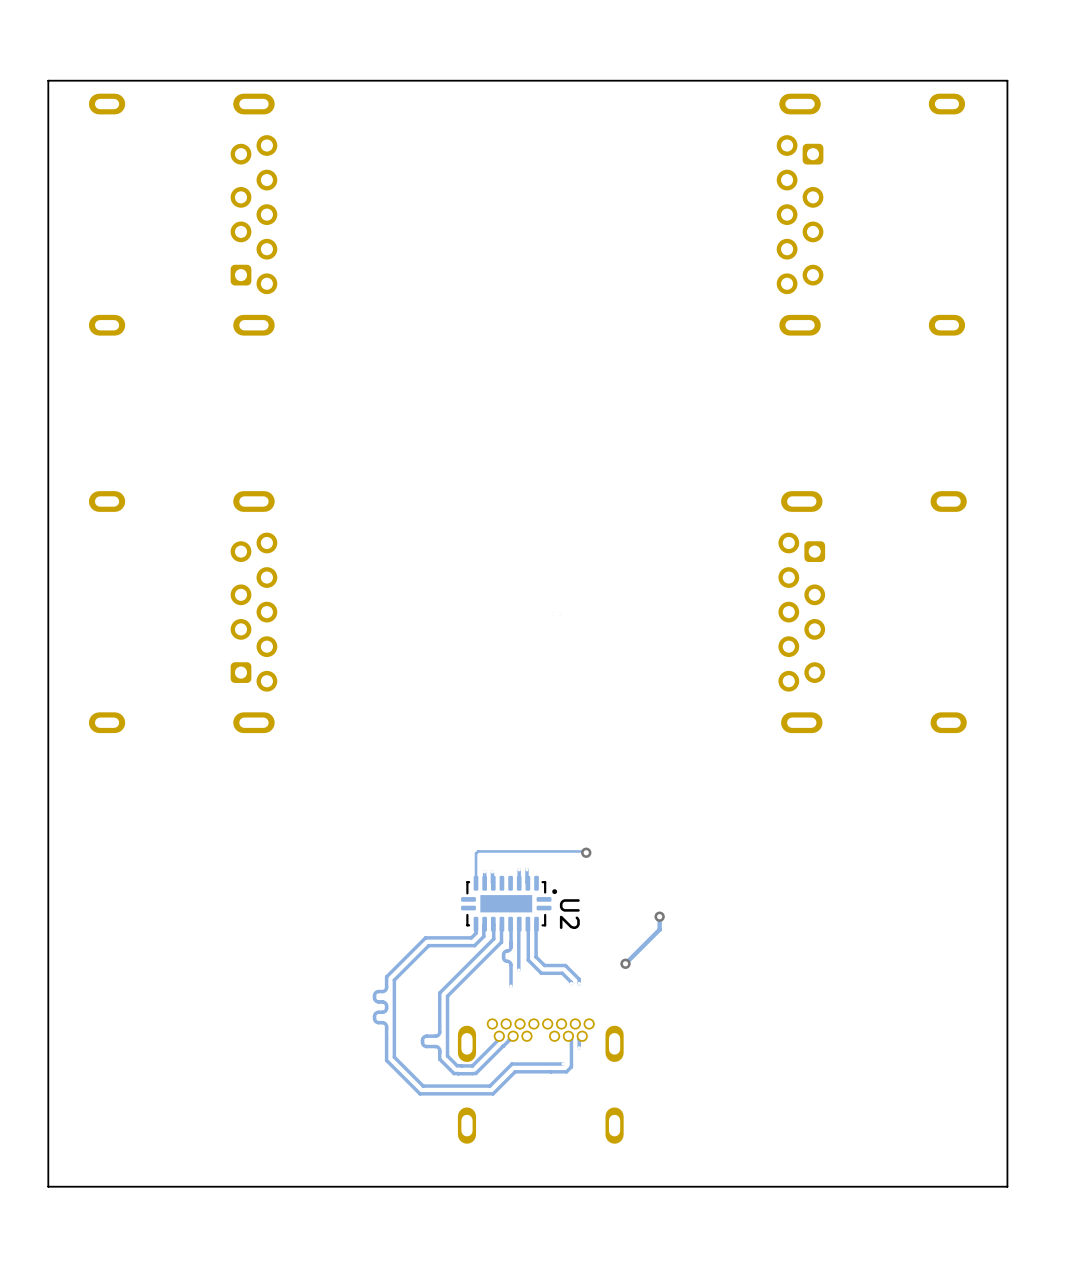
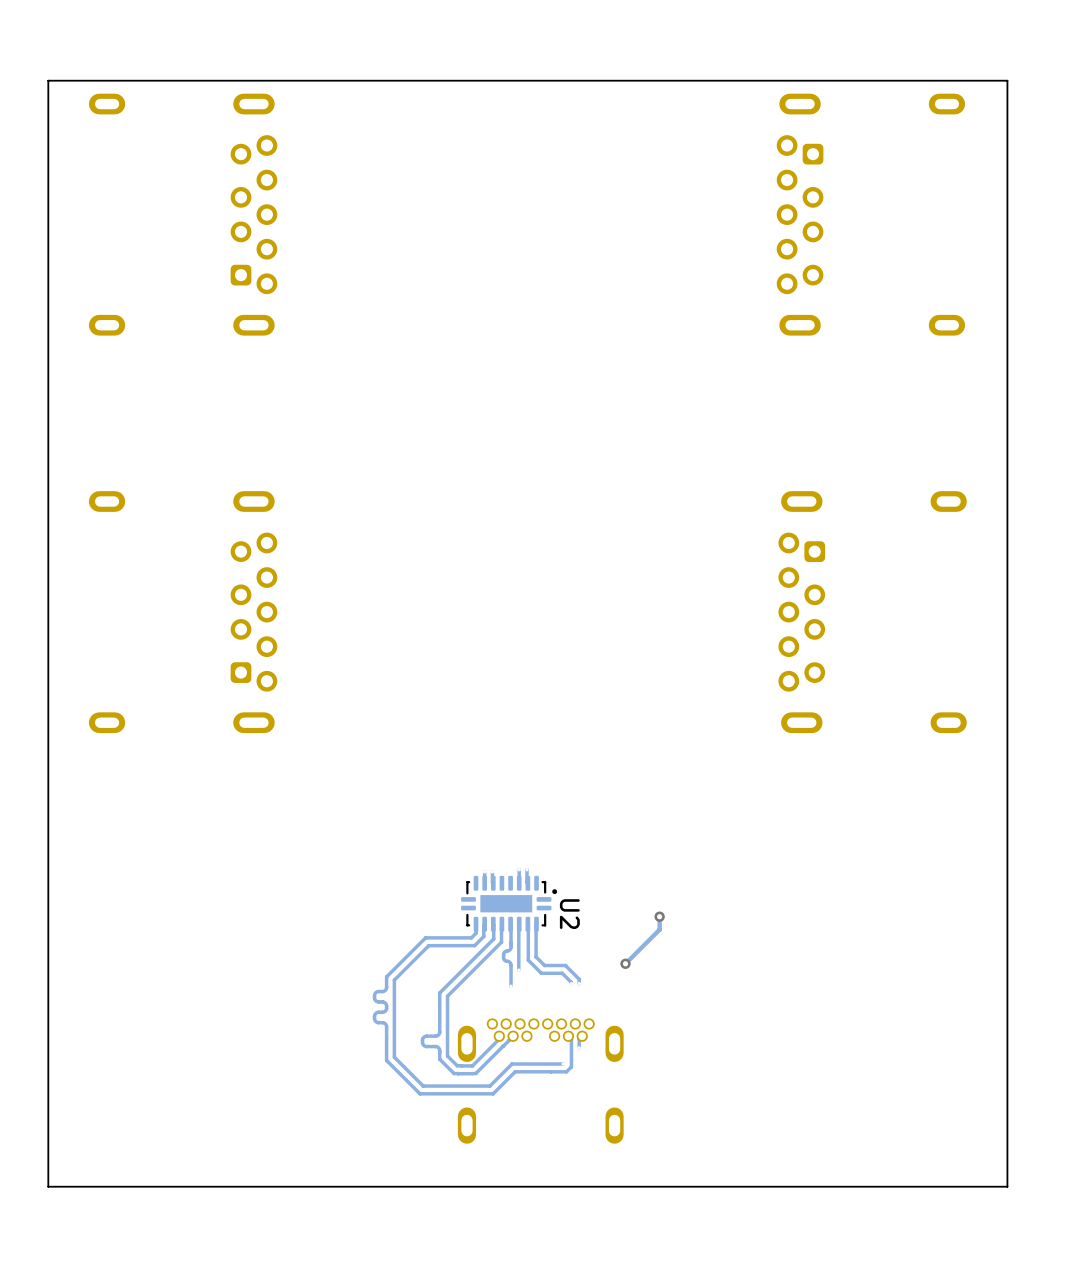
track: (586, 852) (478, 851) (476, 853) (476, 883) -> none
via: (586, 852) -> none

